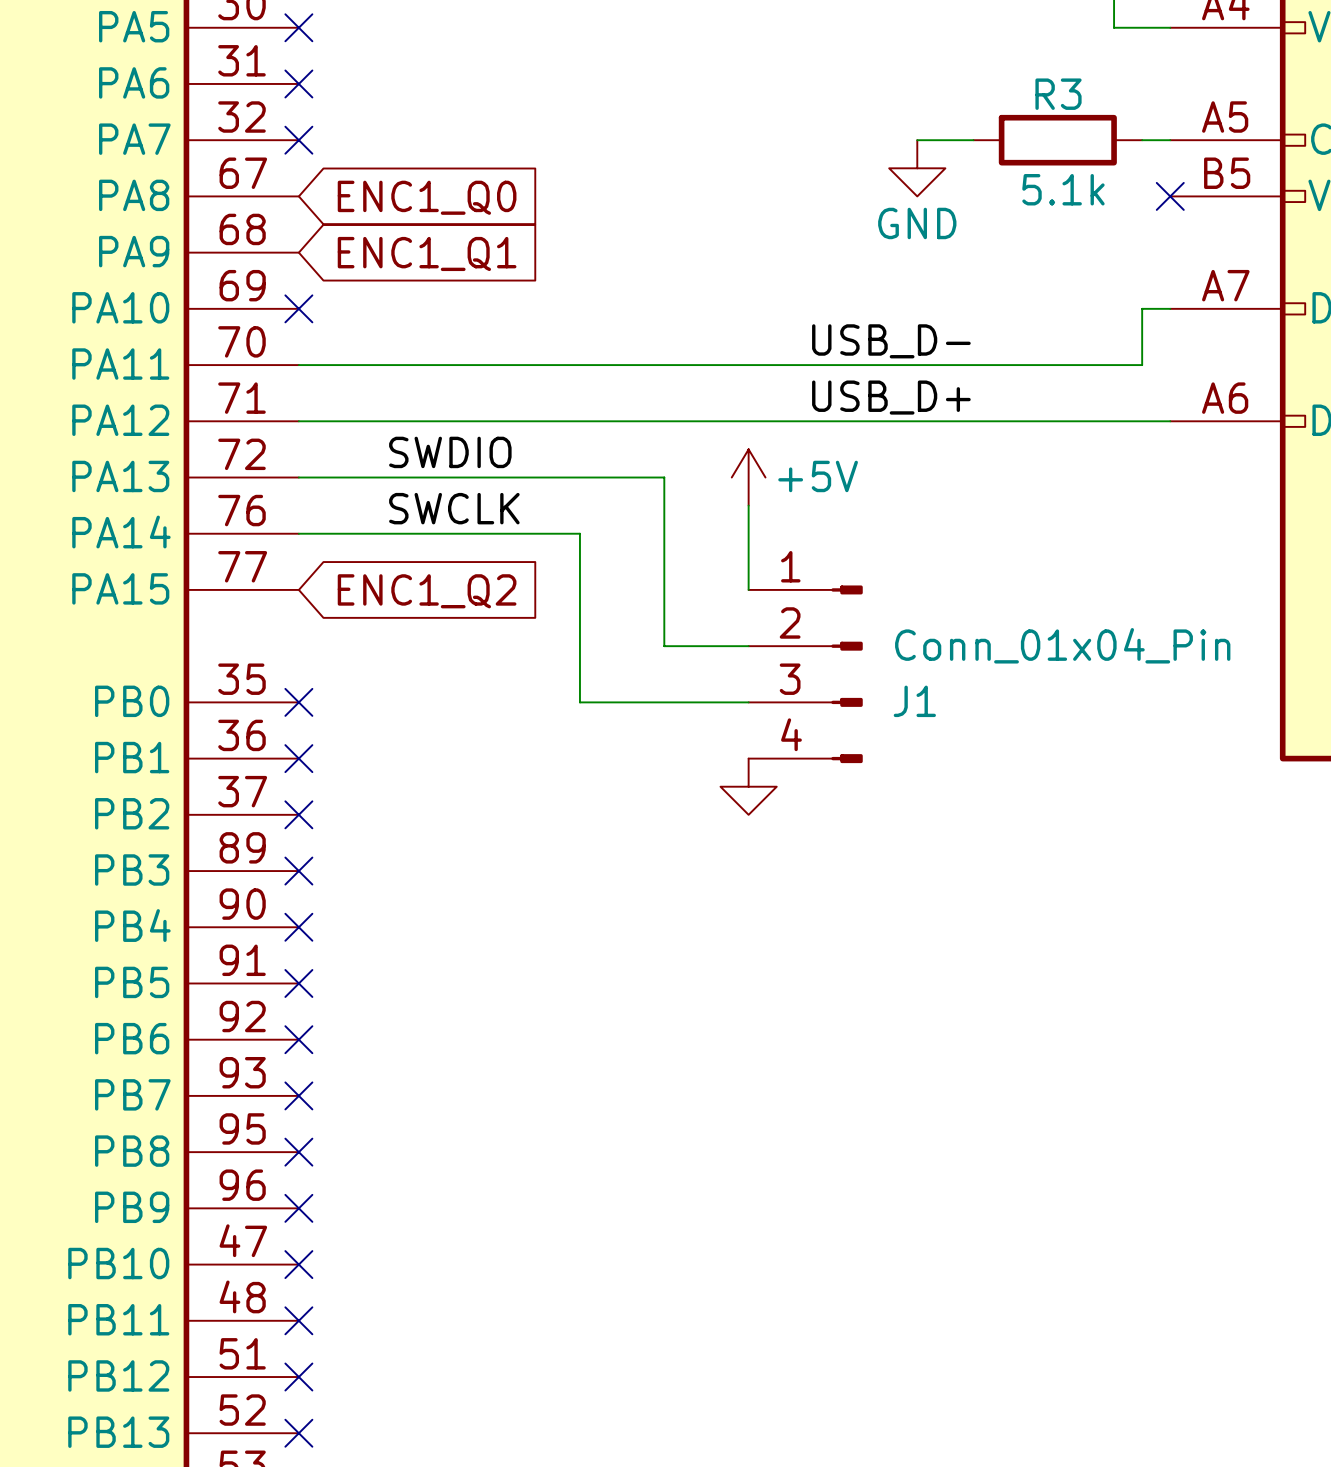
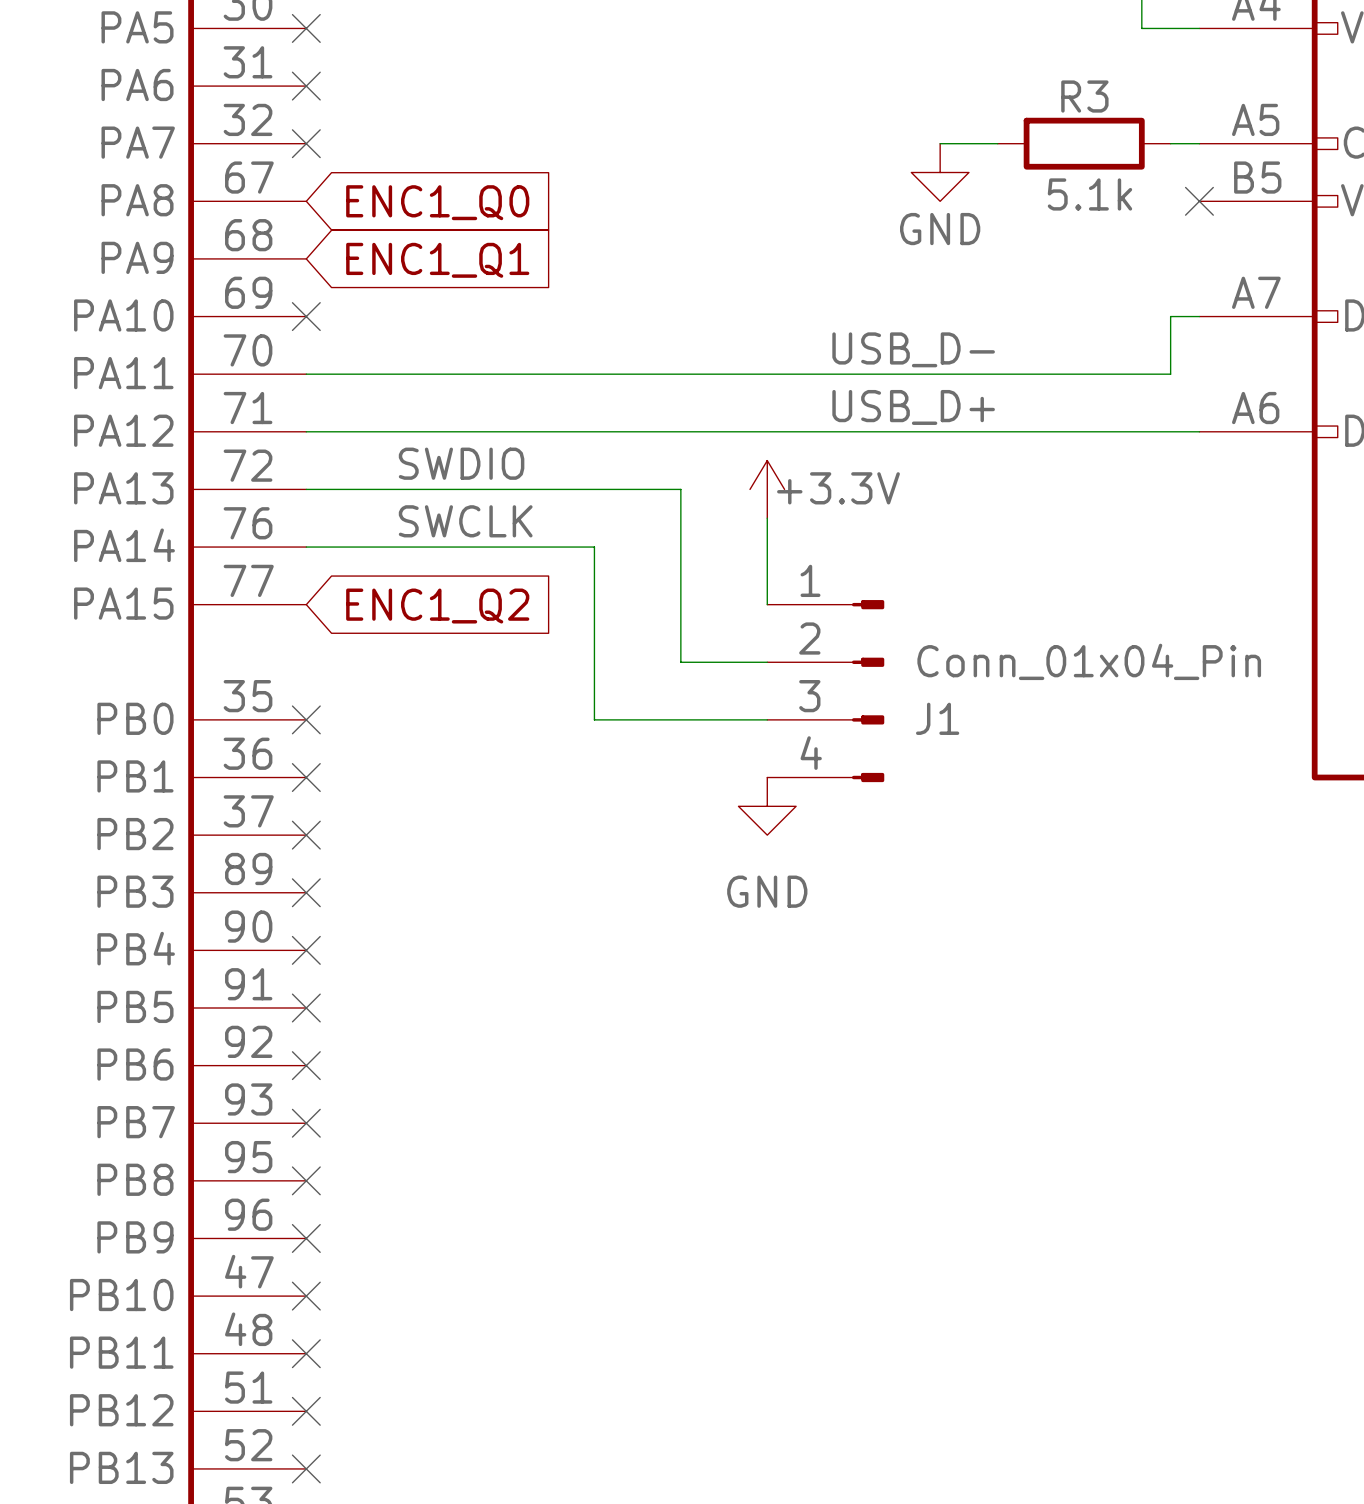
power symbol: +5V (748, 477) -> +3.3V (767, 489)
power symbol text: none -> GND (767, 891)

